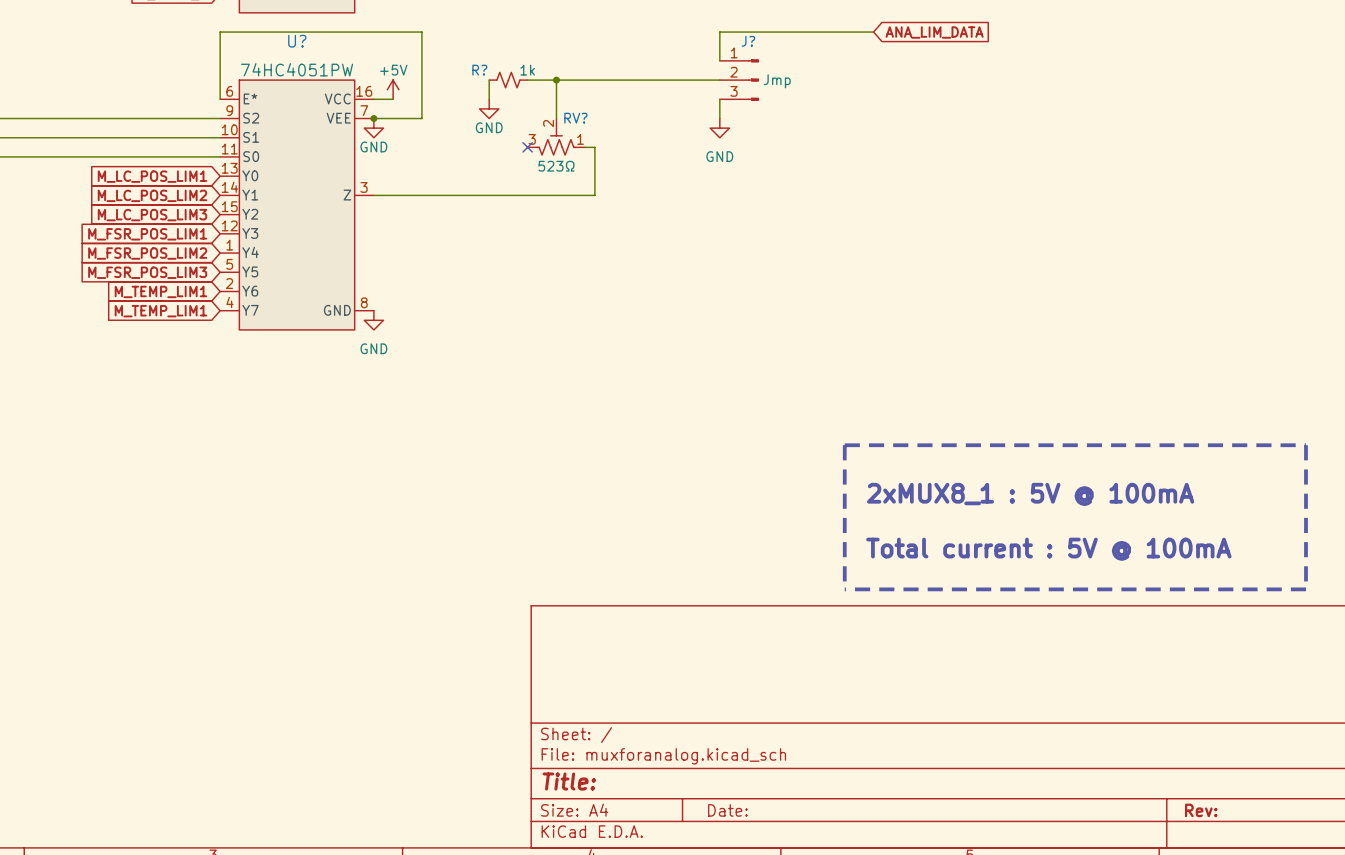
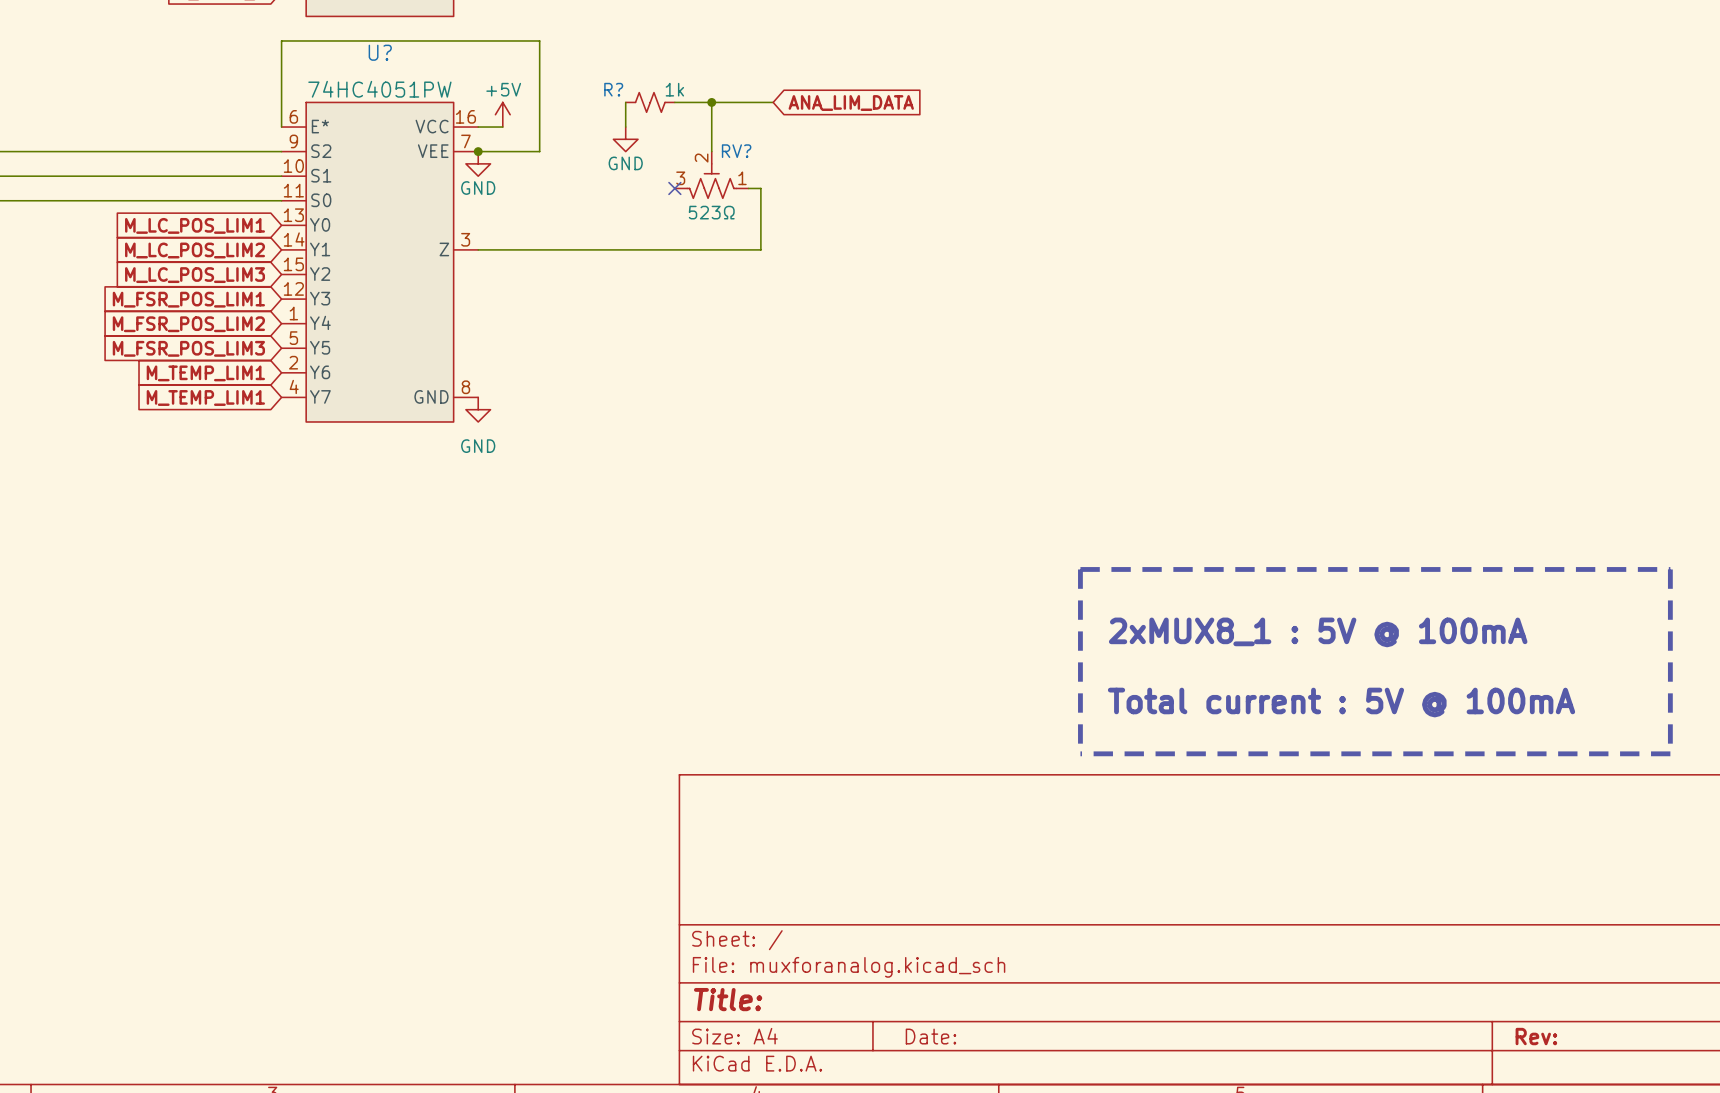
wire: (873, 32) (719, 32) (719, 60) -> none
global label: ANA_LIM_DATA (934, 32) -> none
wire: (604, 80) (719, 80) -> none
global label: none -> ANA_LIM_DATA (851, 103)
J?: Jmp (739, 80) -> none
wire: (719, 99) (719, 118) -> none
power symbol: GND (719, 128) -> none

